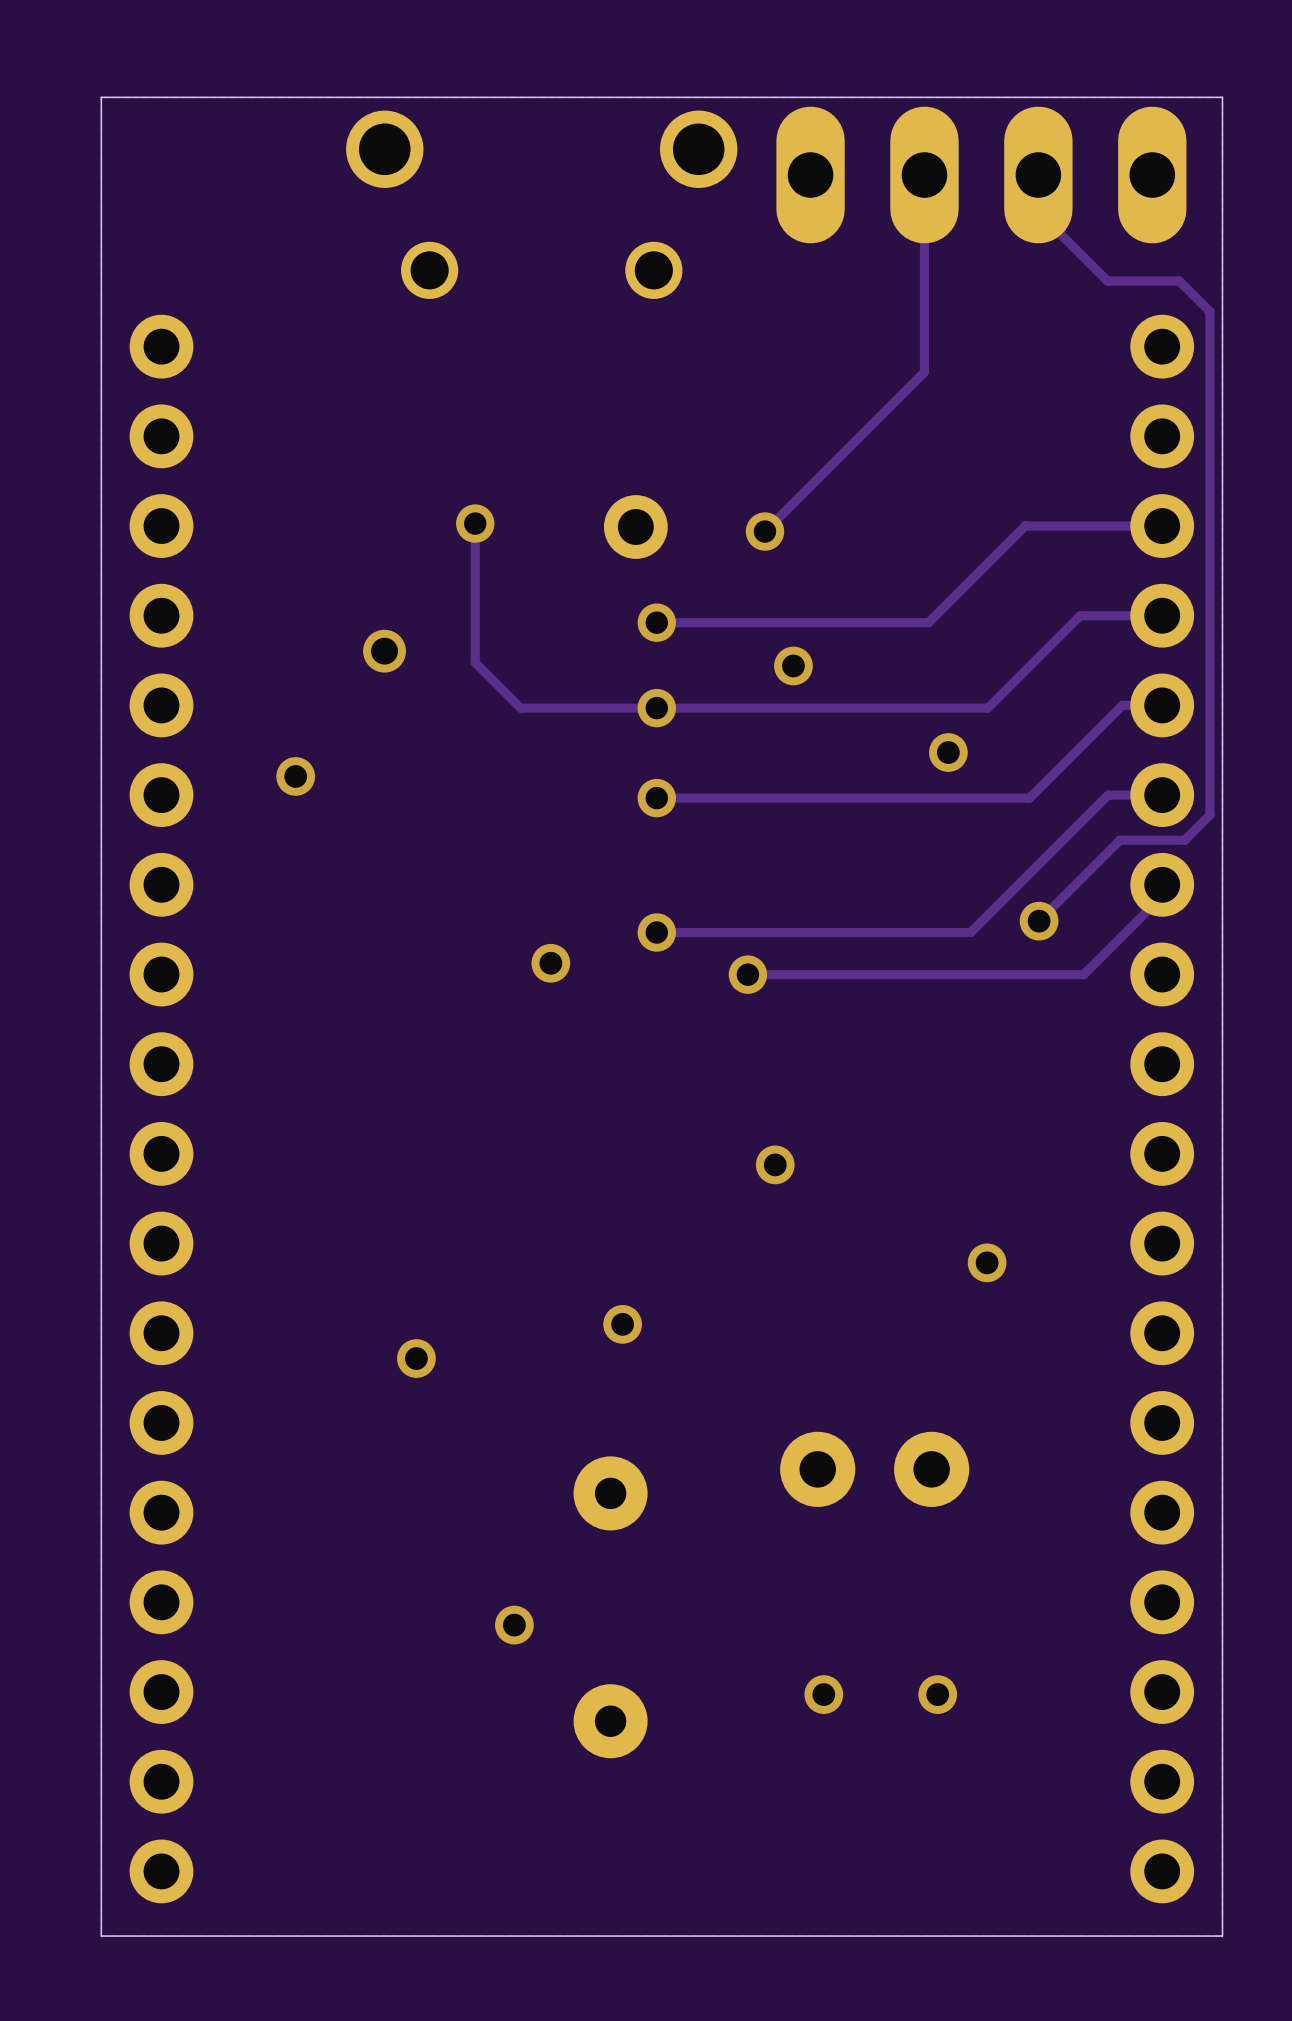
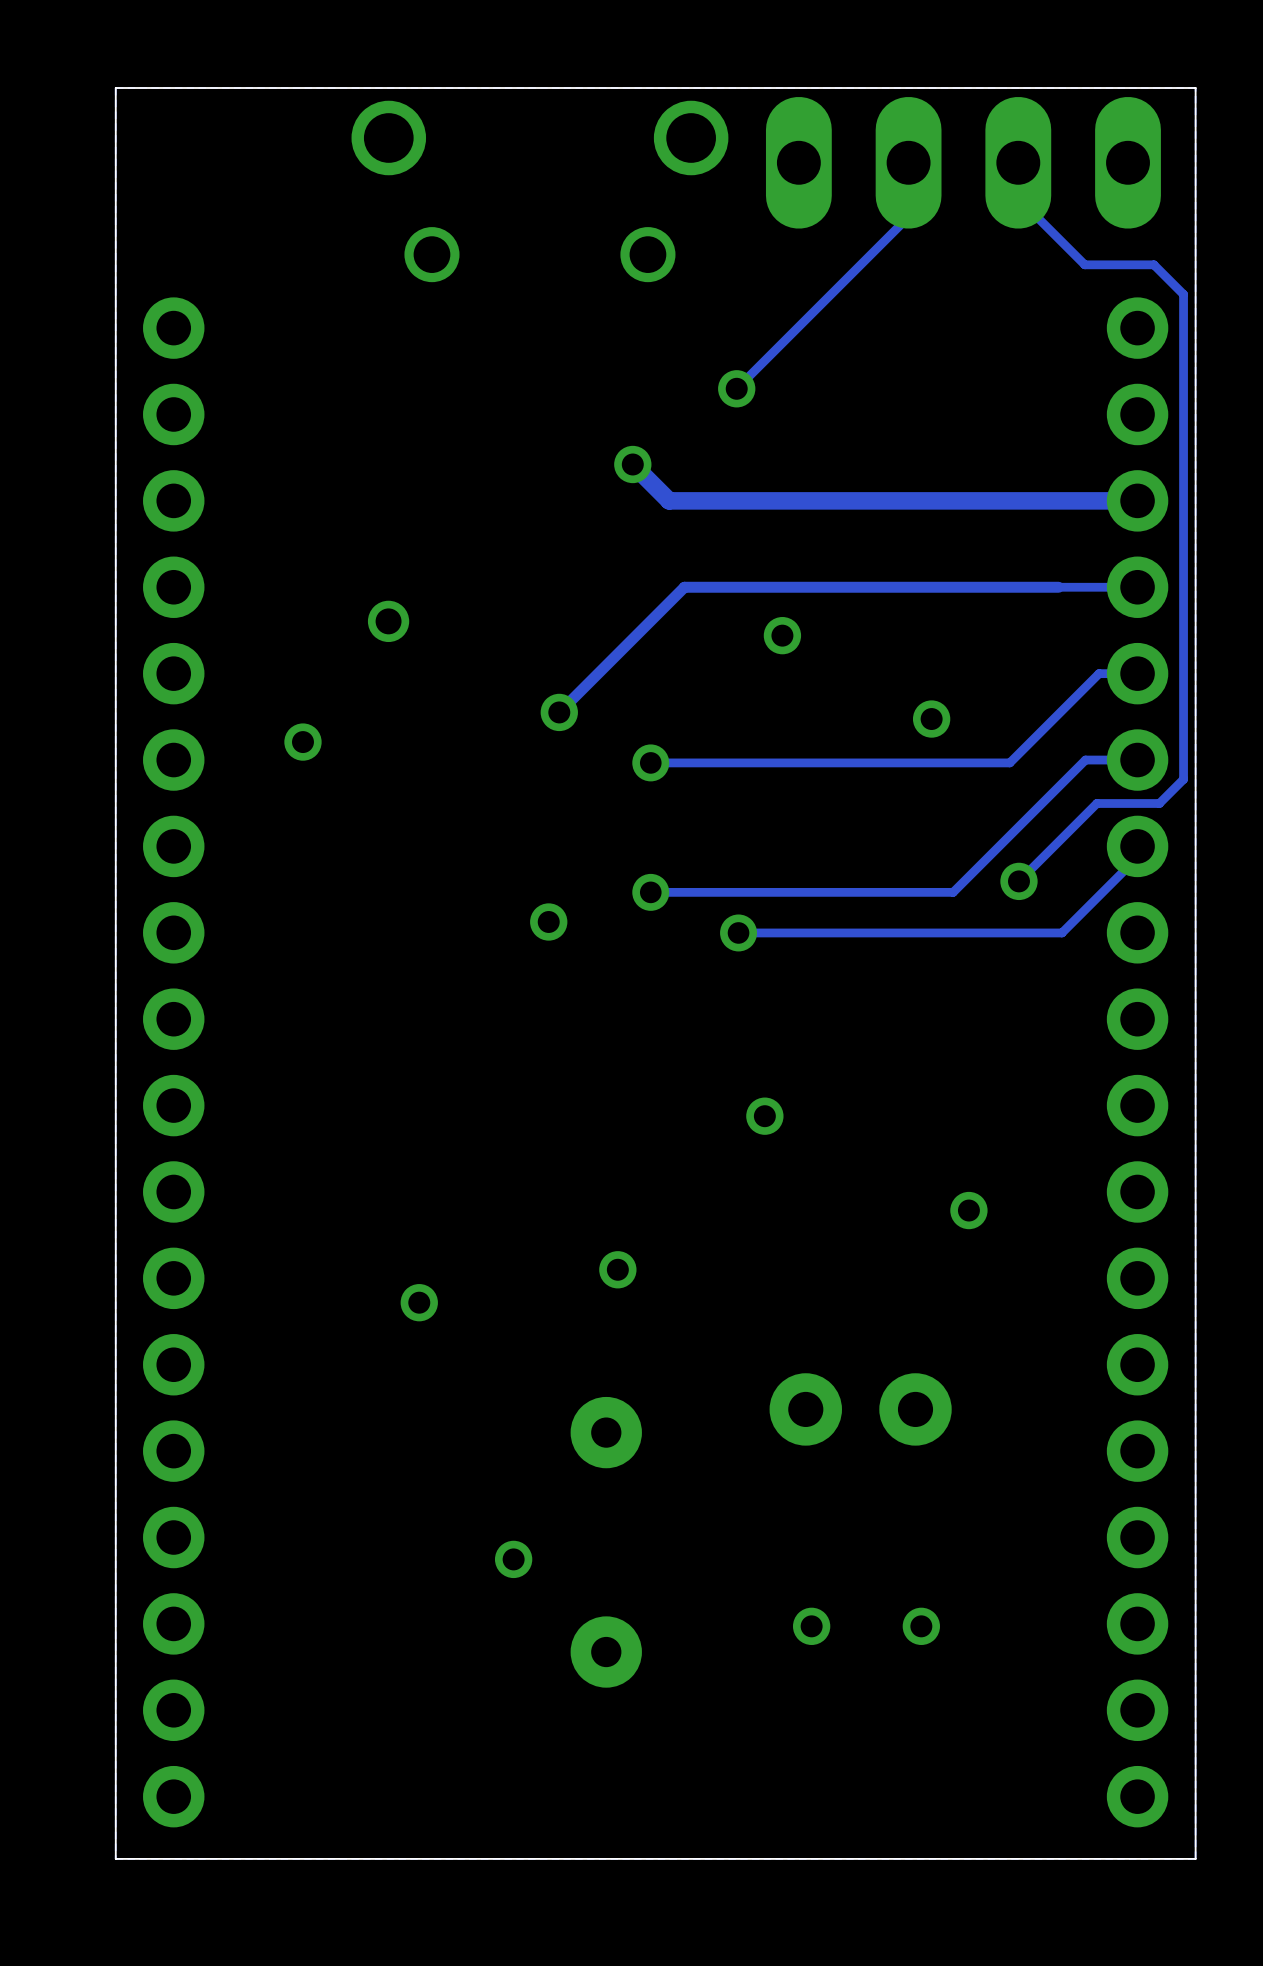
track: (924, 231) (924, 372) (764, 531) -> (908, 216) (736, 388)
via: none -> (736, 388)
via: none -> (632, 464)
track: (475, 523) (475, 662) (520, 708) (987, 708) (1080, 615) -> (559, 712) (684, 587) (1058, 587)
via: (475, 523) -> none
track: (1025, 525) (928, 622) (656, 622) -> (1006, 500) (669, 500) (632, 464)
track width: thin (1162, 526) (1025, 526) -> thick (1137, 500) (1006, 500)
part: (635, 527) -> none
via: (764, 531) -> none
via: (656, 622) -> none
via: (656, 708) -> none
via: none -> (559, 712)

